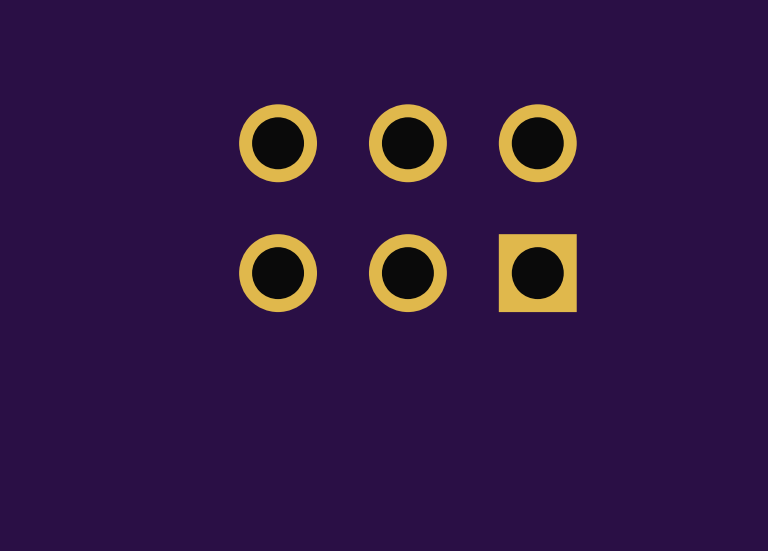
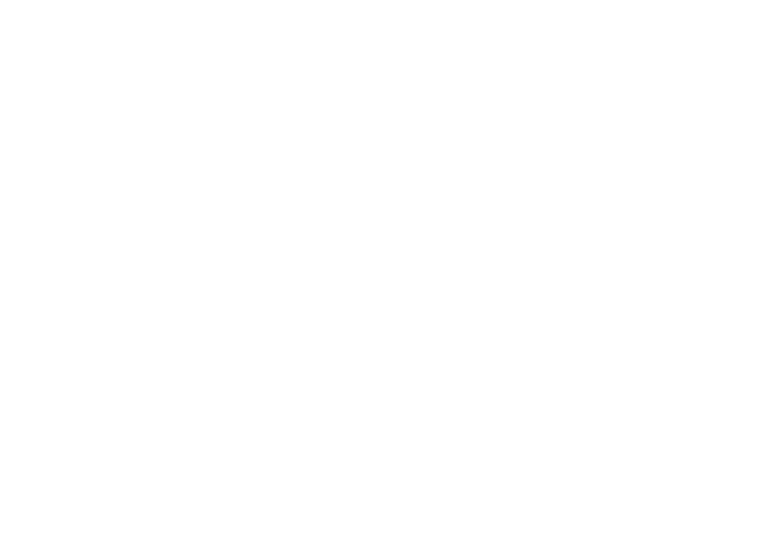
part: (407, 208) -> none

